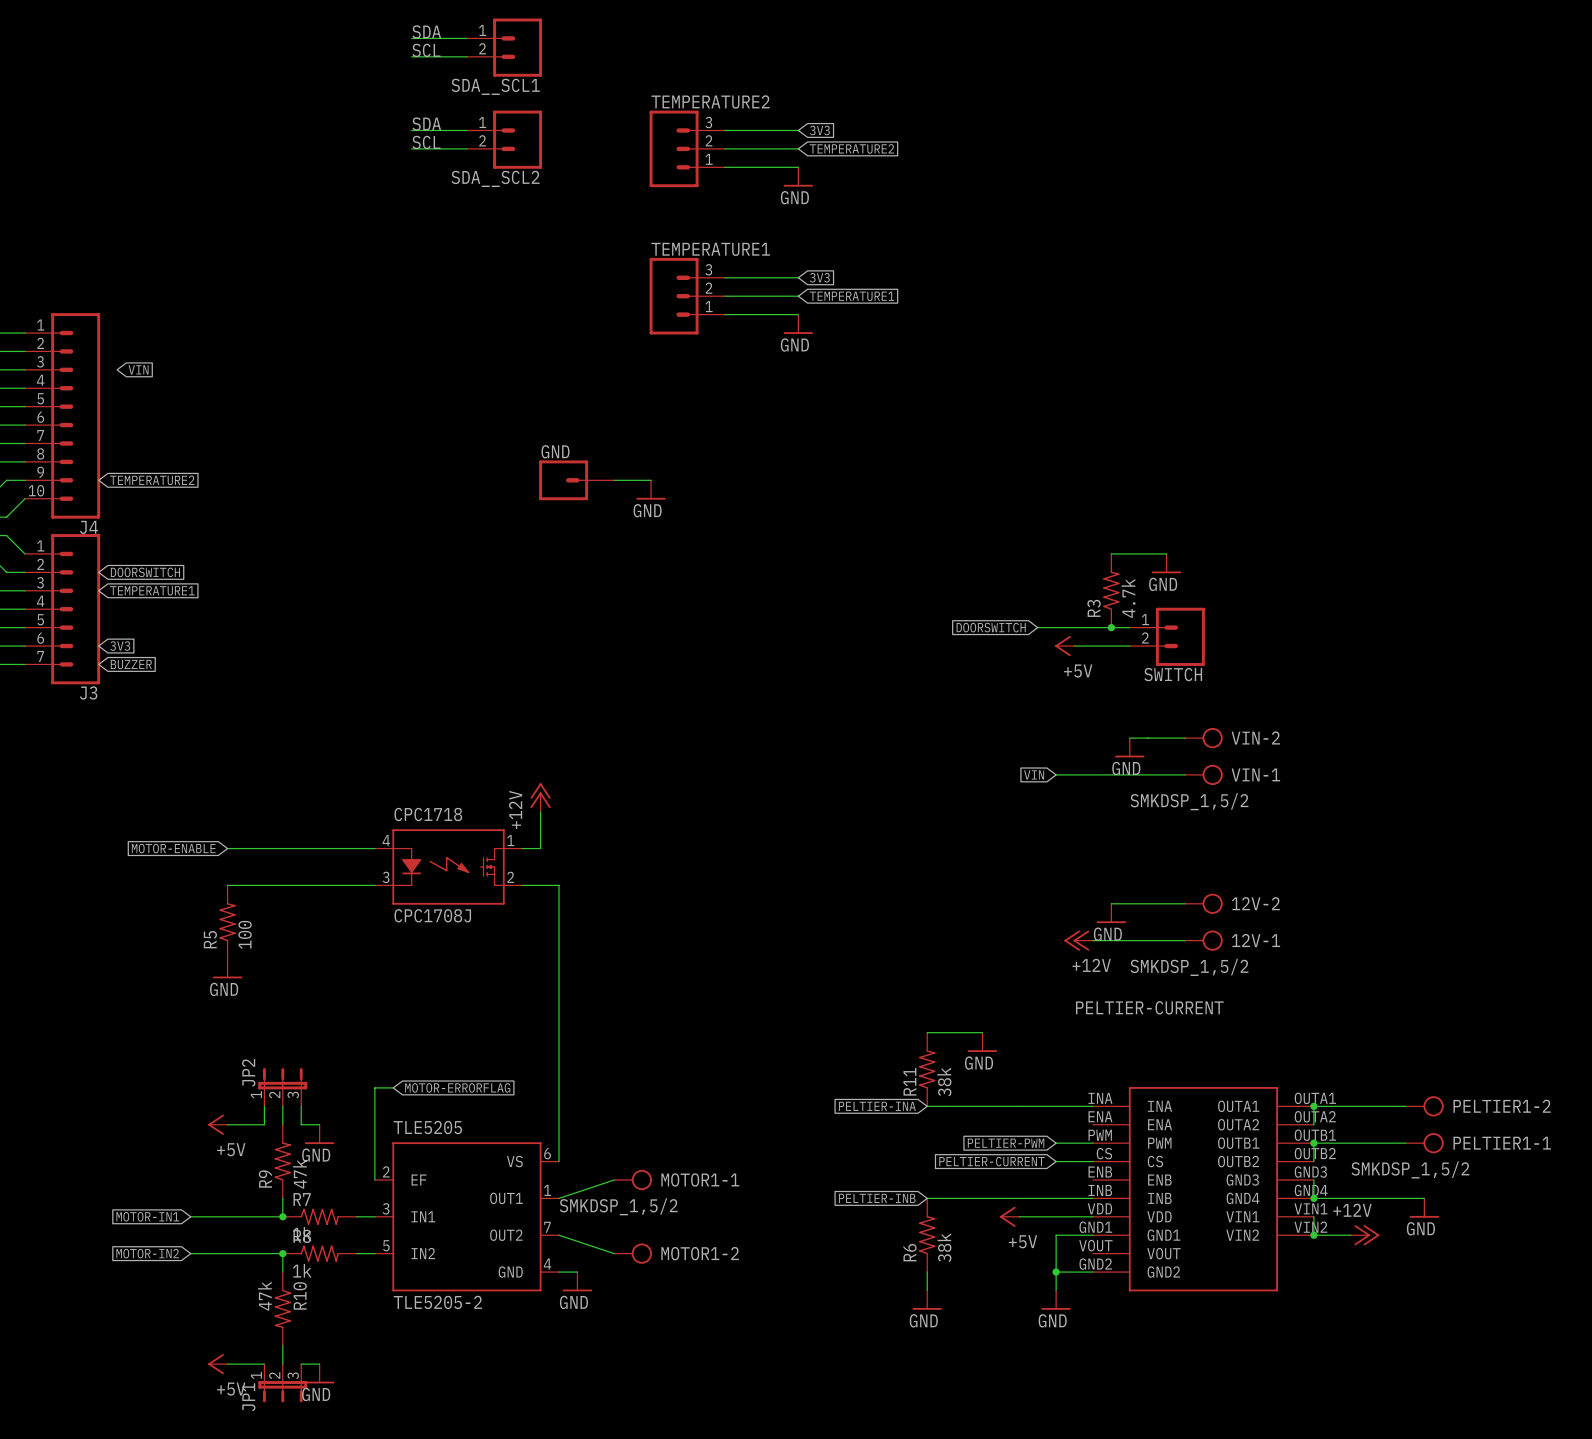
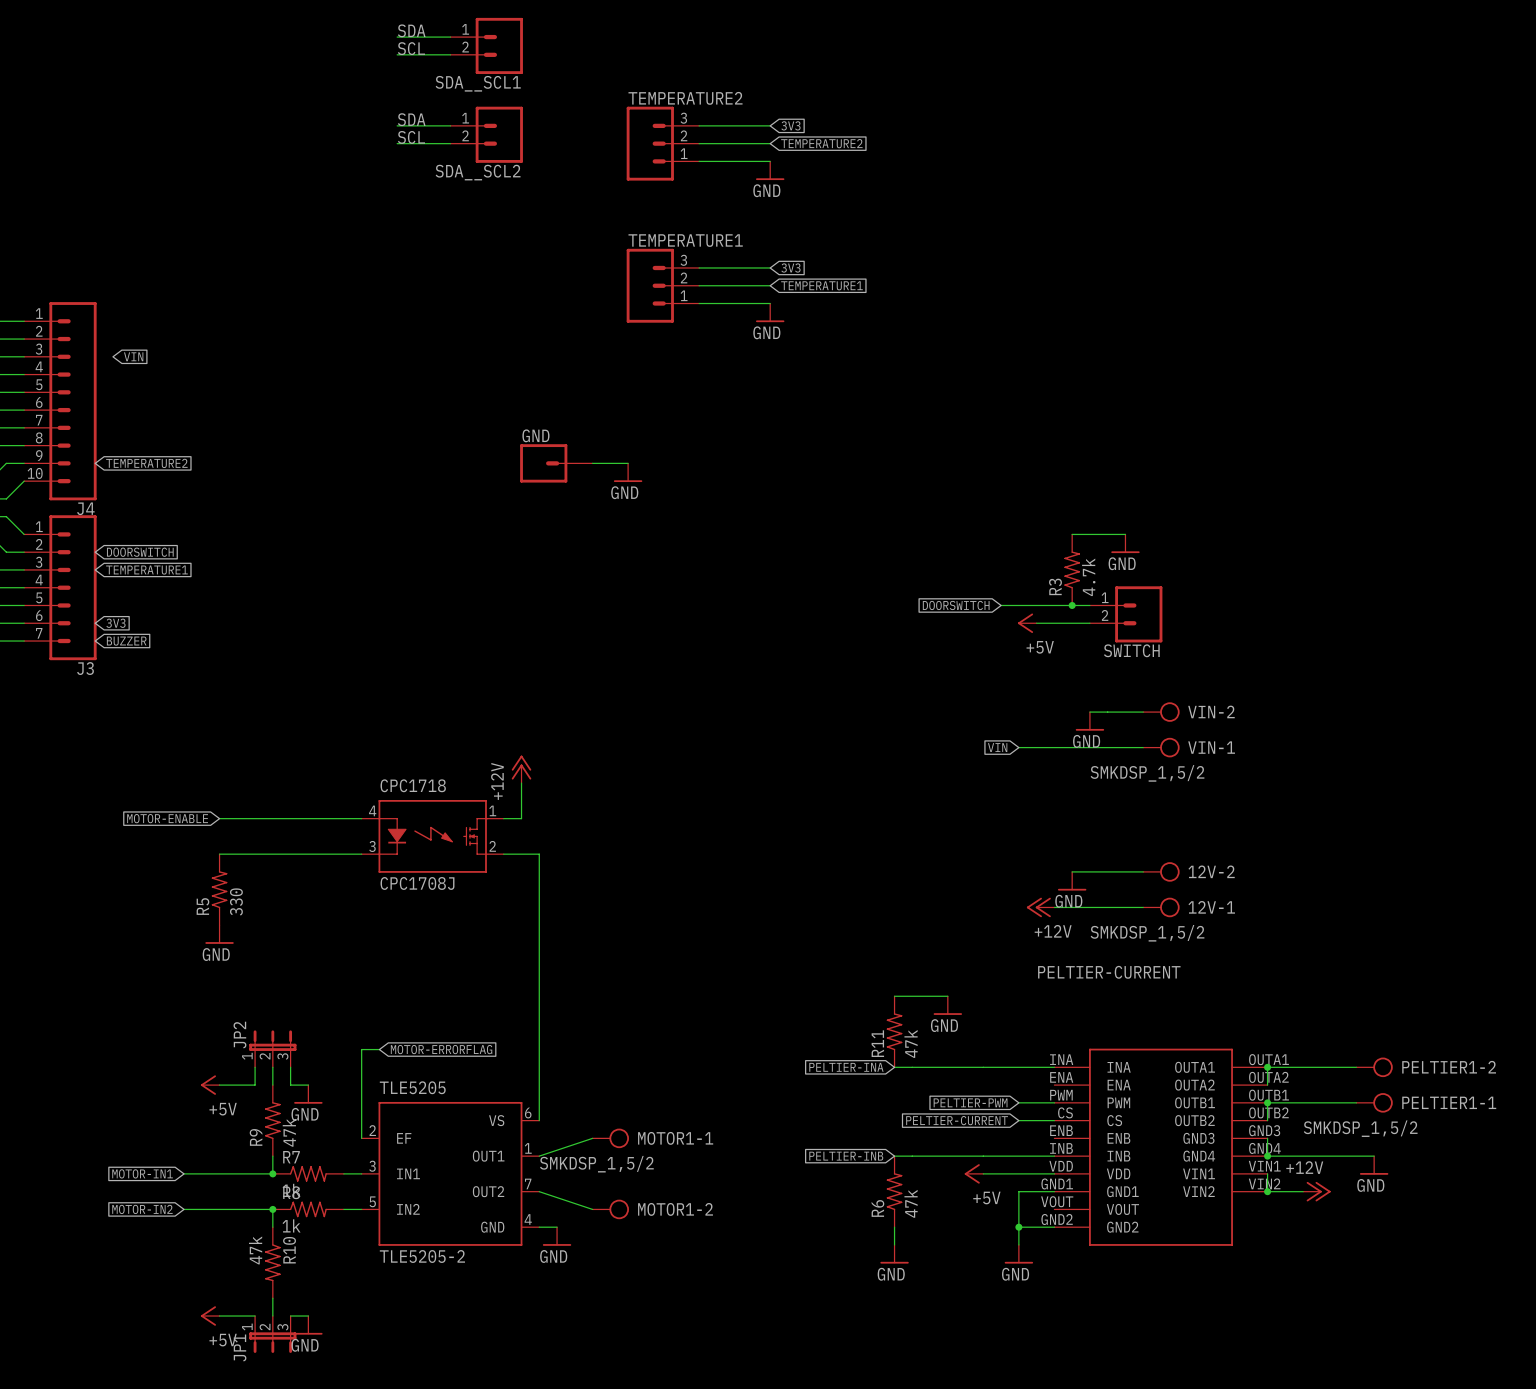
R5 value: 100 (245, 934) -> 330 (236, 901)
R11 value: 38k (944, 1081) -> 47k (911, 1043)
R6 value: 38k (944, 1247) -> 47k (911, 1203)

